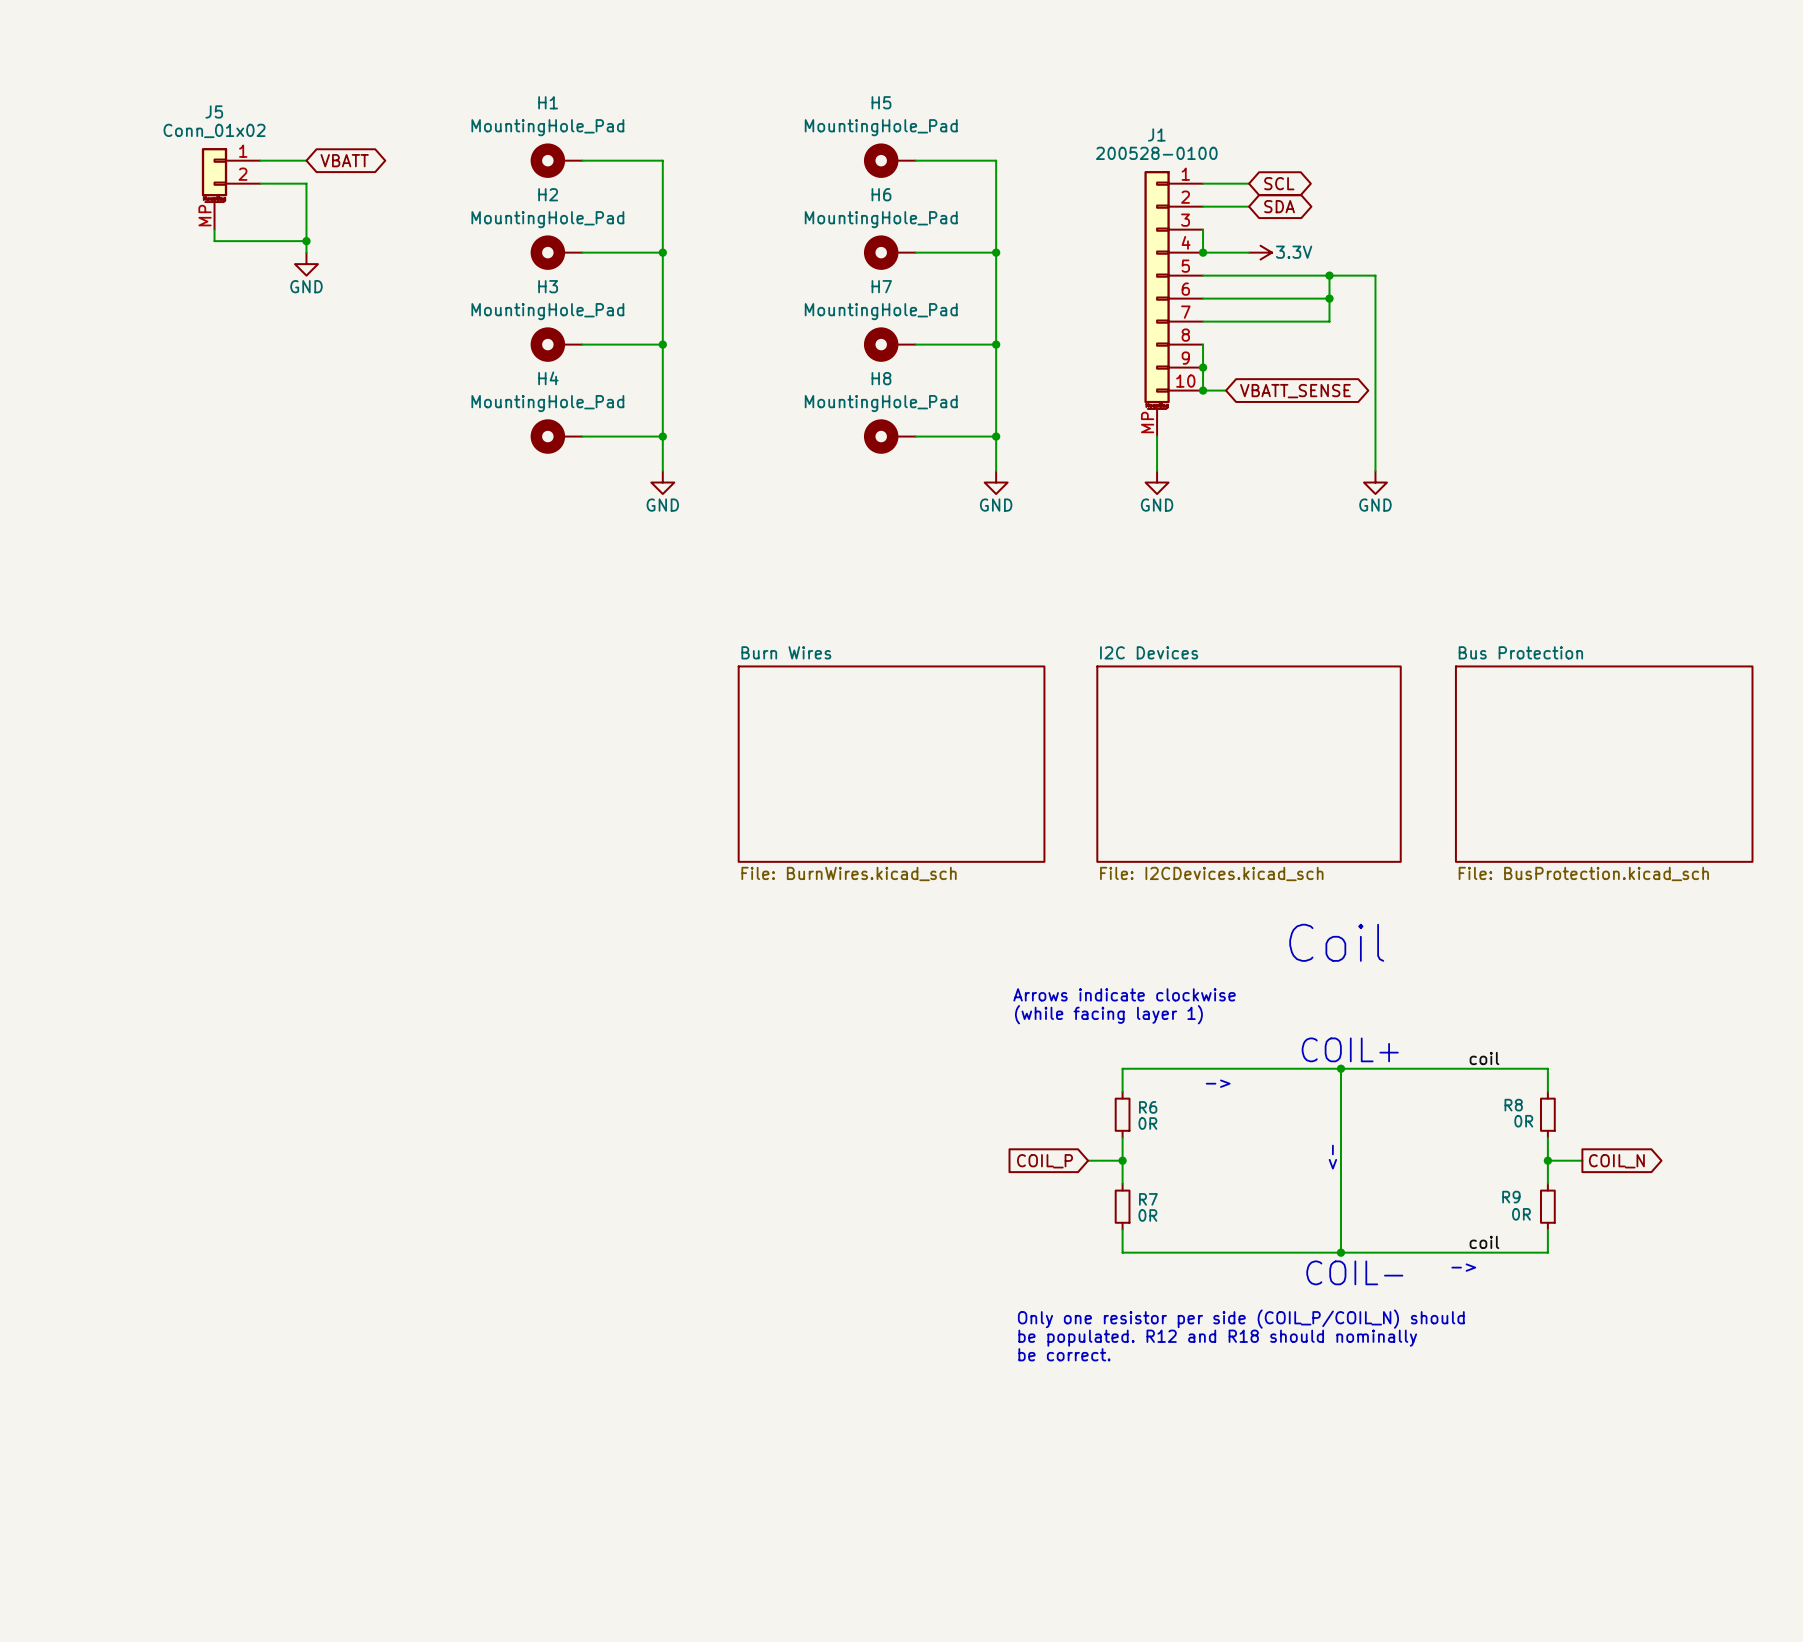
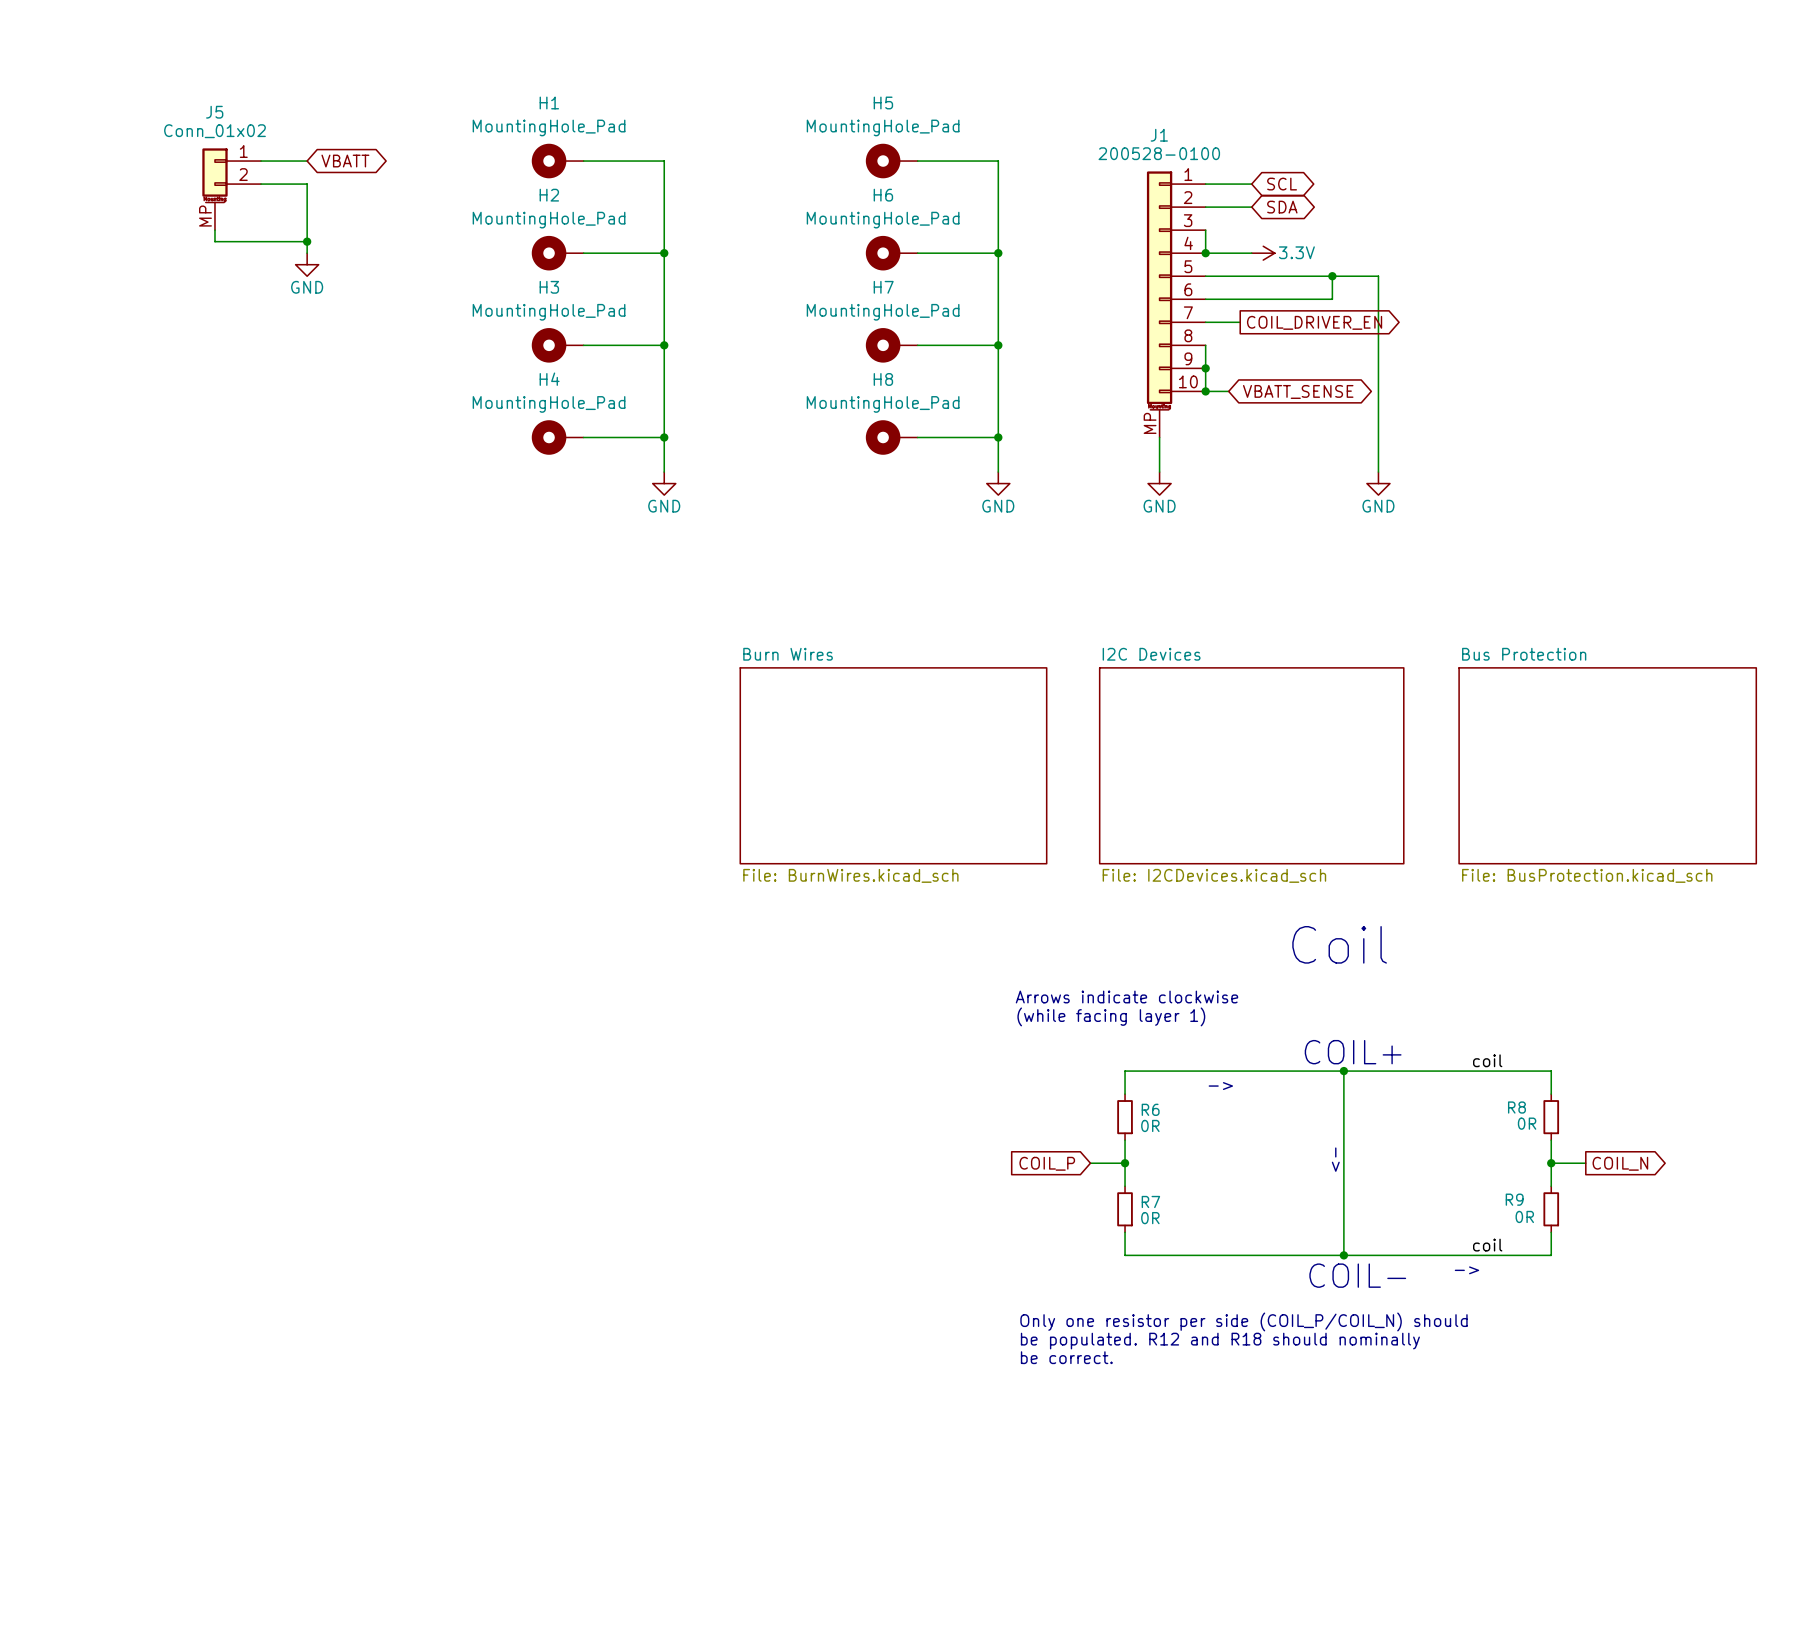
wire: (1329, 298) (1329, 321) (1237, 321) -> none
junction: (1329, 298) -> none
global label: none -> COIL_DRIVER_EN (1314, 322)

